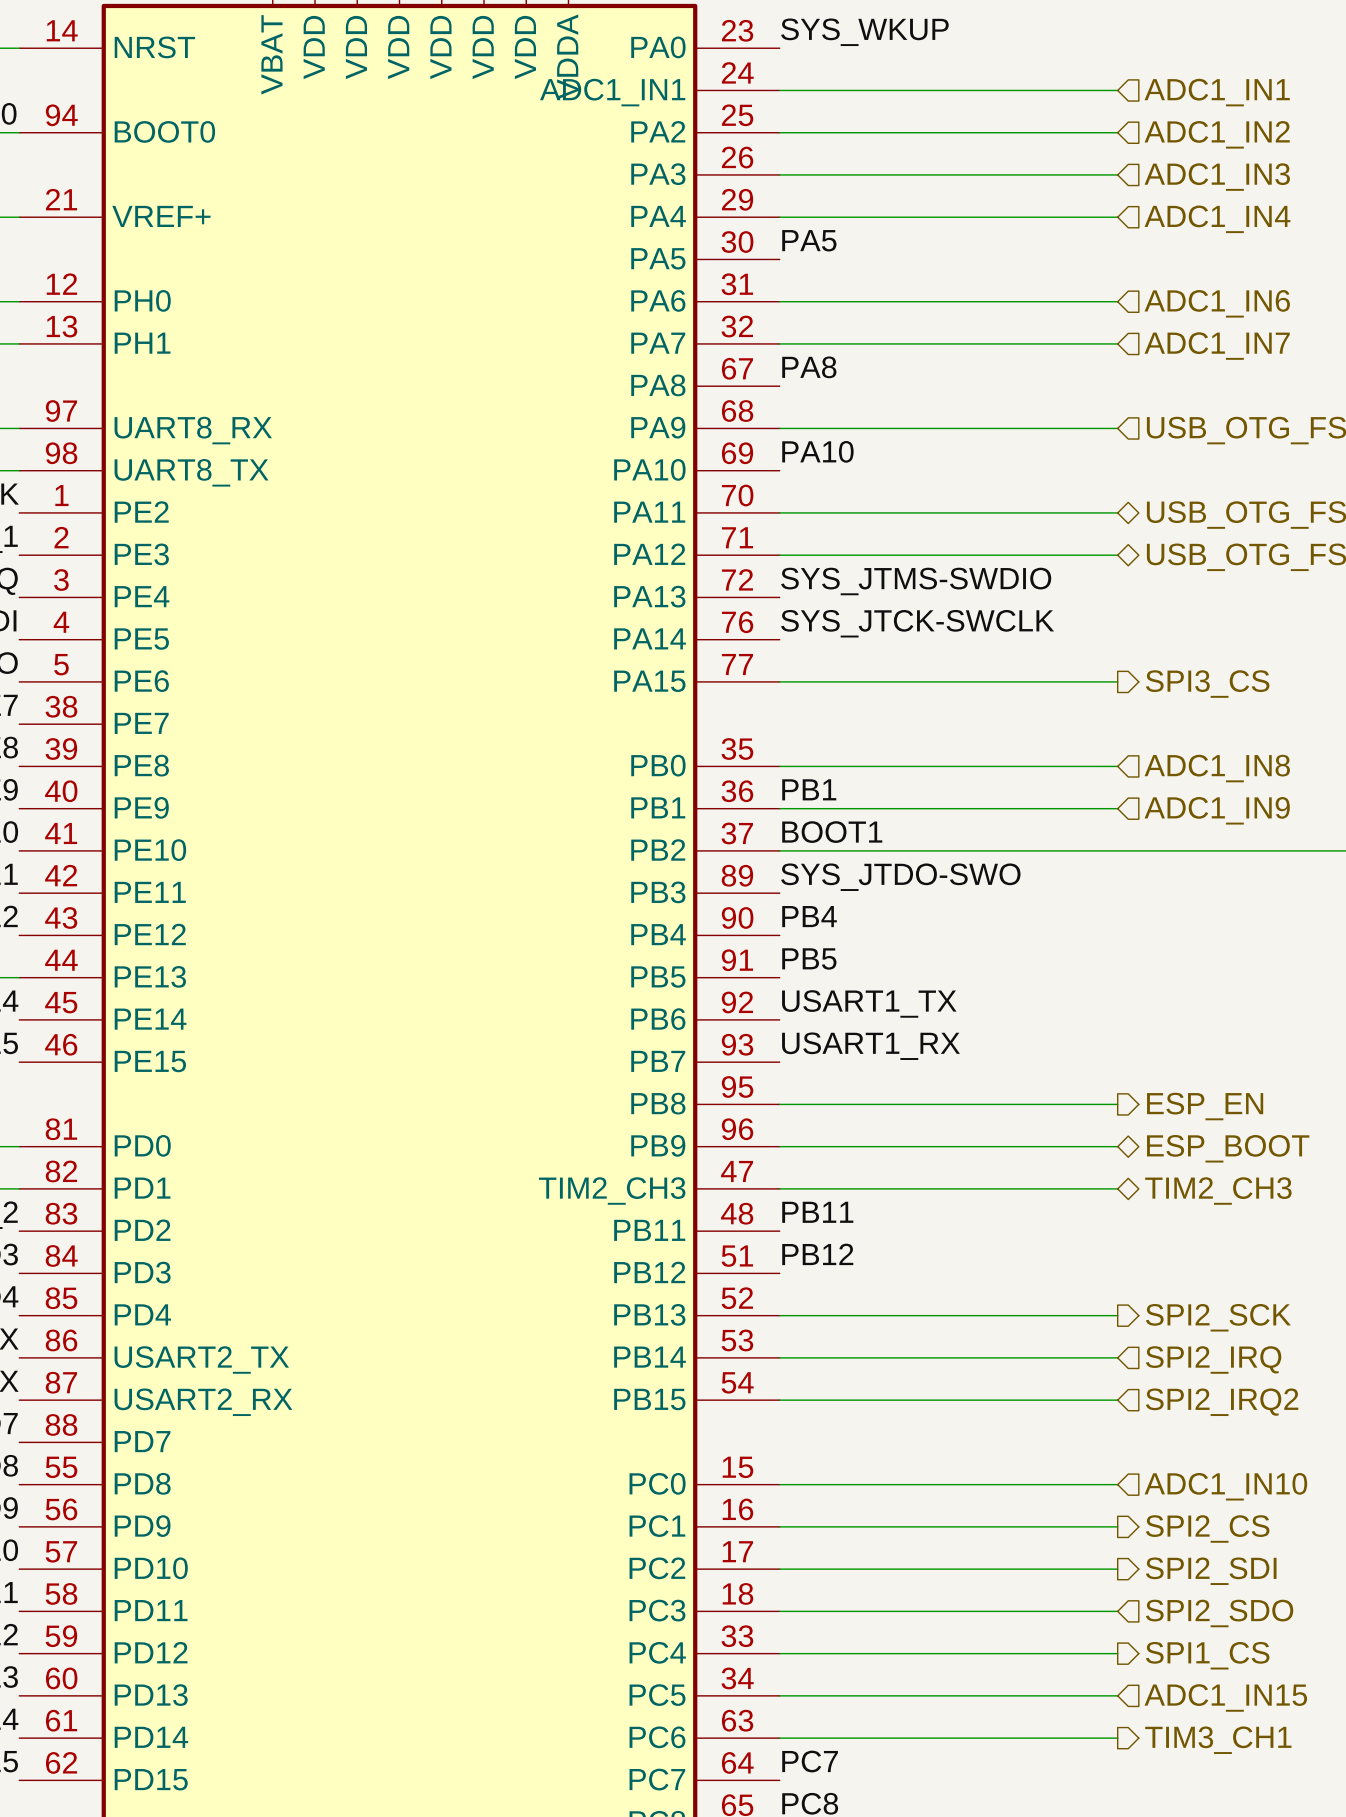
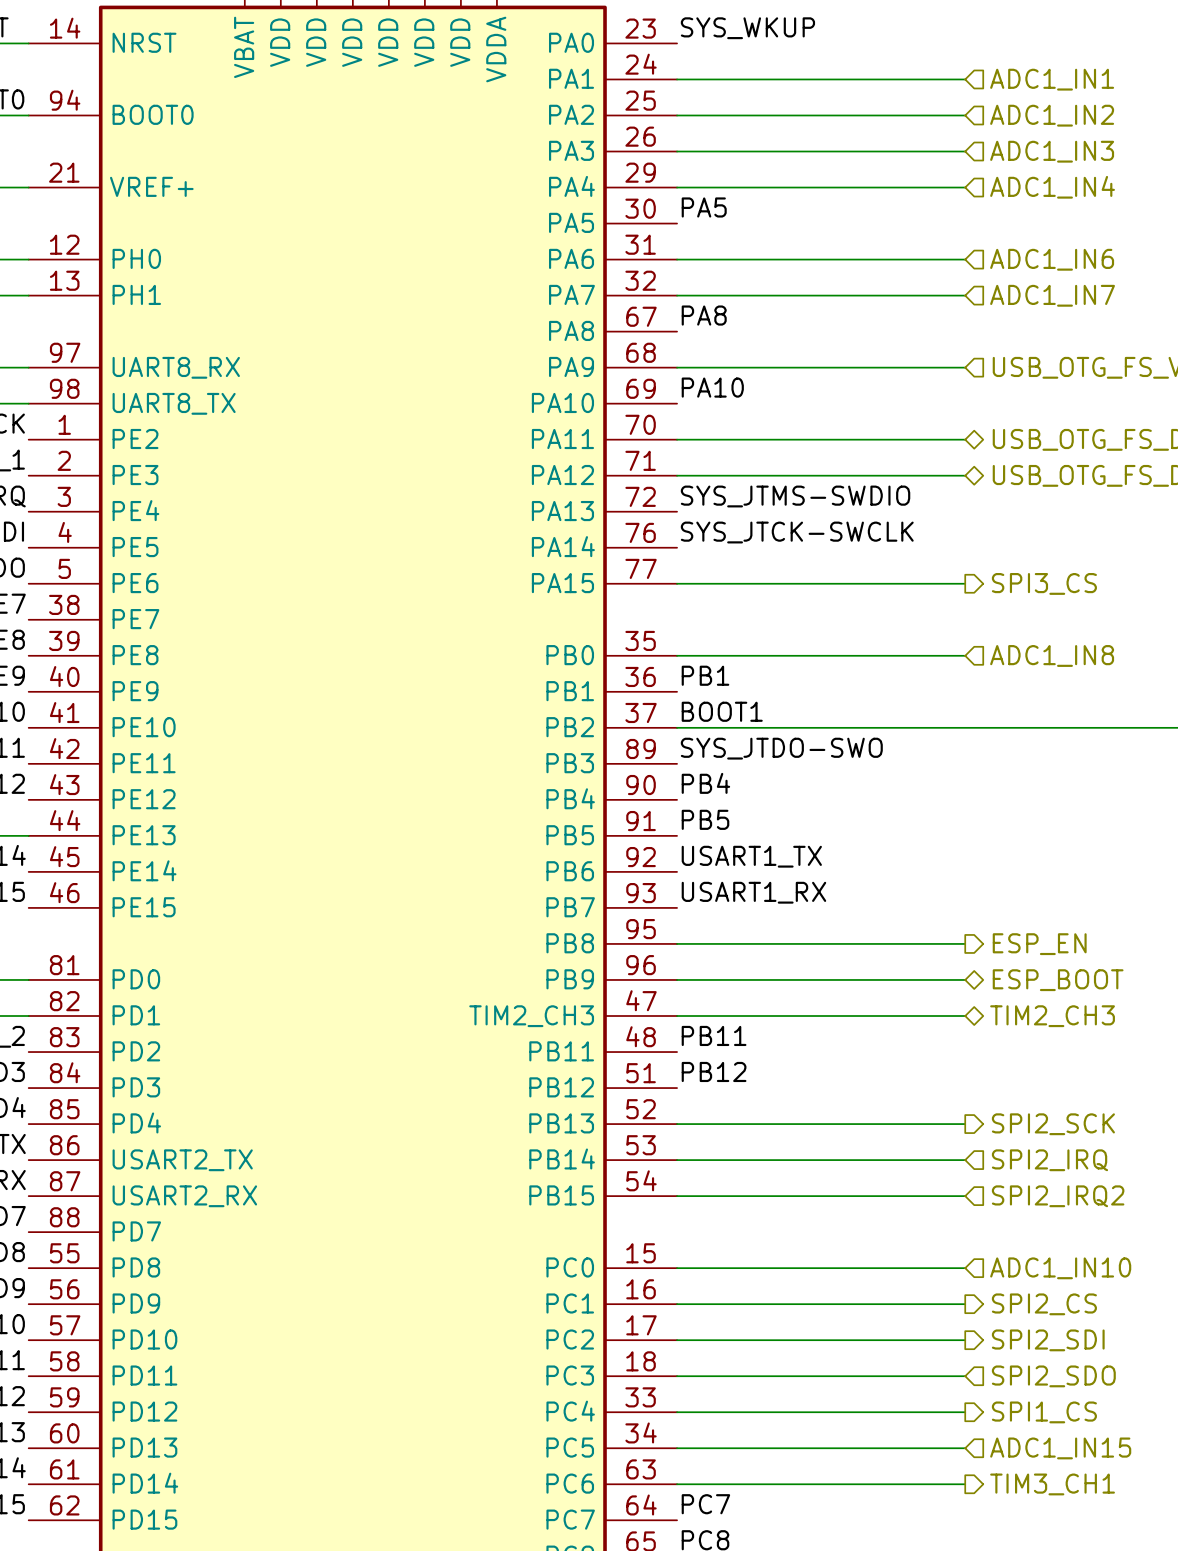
part pin name: ADC1_IN1 (612, 92) -> PA1 (571, 78)
wire: (779, 808) (1117, 808) -> none
hierarchical label: ADC1_IN9 (1217, 810) -> none

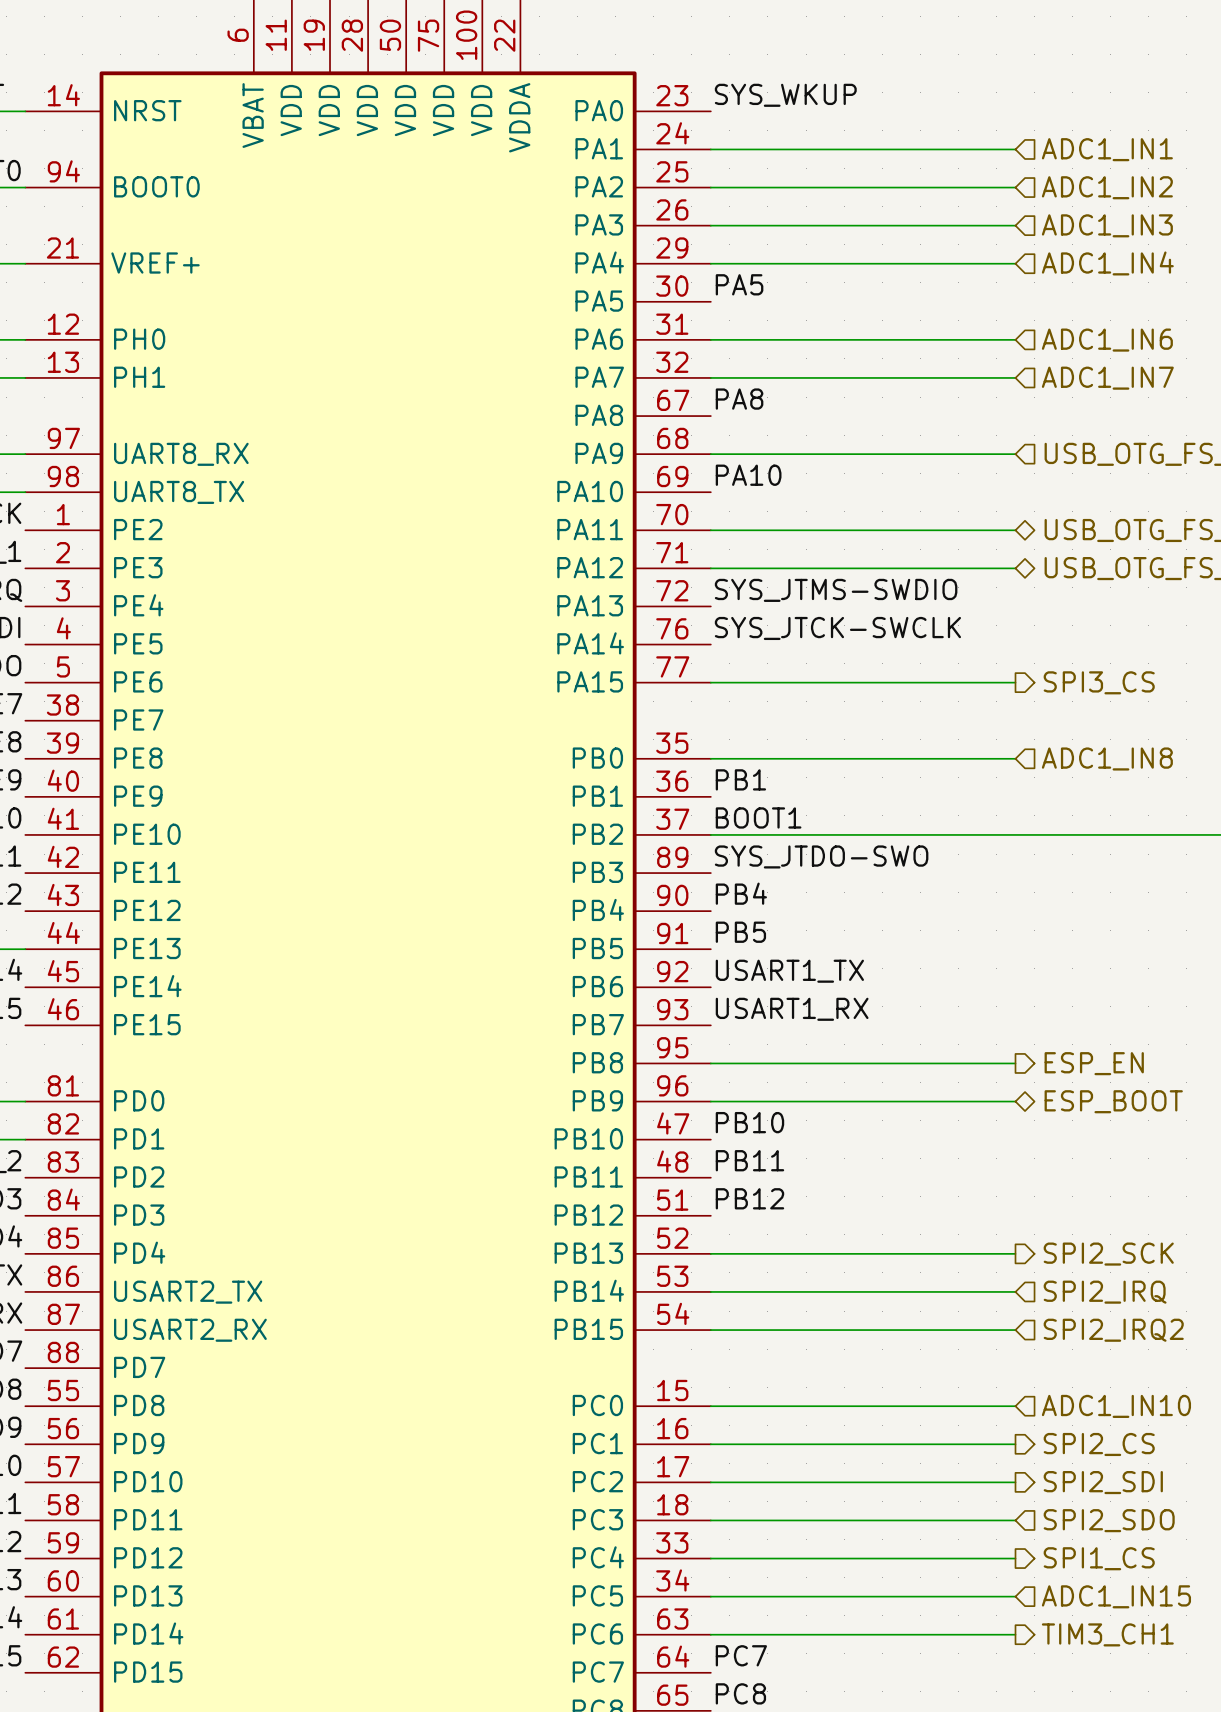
label: none -> PB10 (749, 1122)
part pin name: TIM2_CH3 (531, 1016) -> PB10 (588, 1138)
wire: (677, 1016) (965, 1016) -> none
hierarchical label: TIM2_CH3 (1052, 1016) -> none

